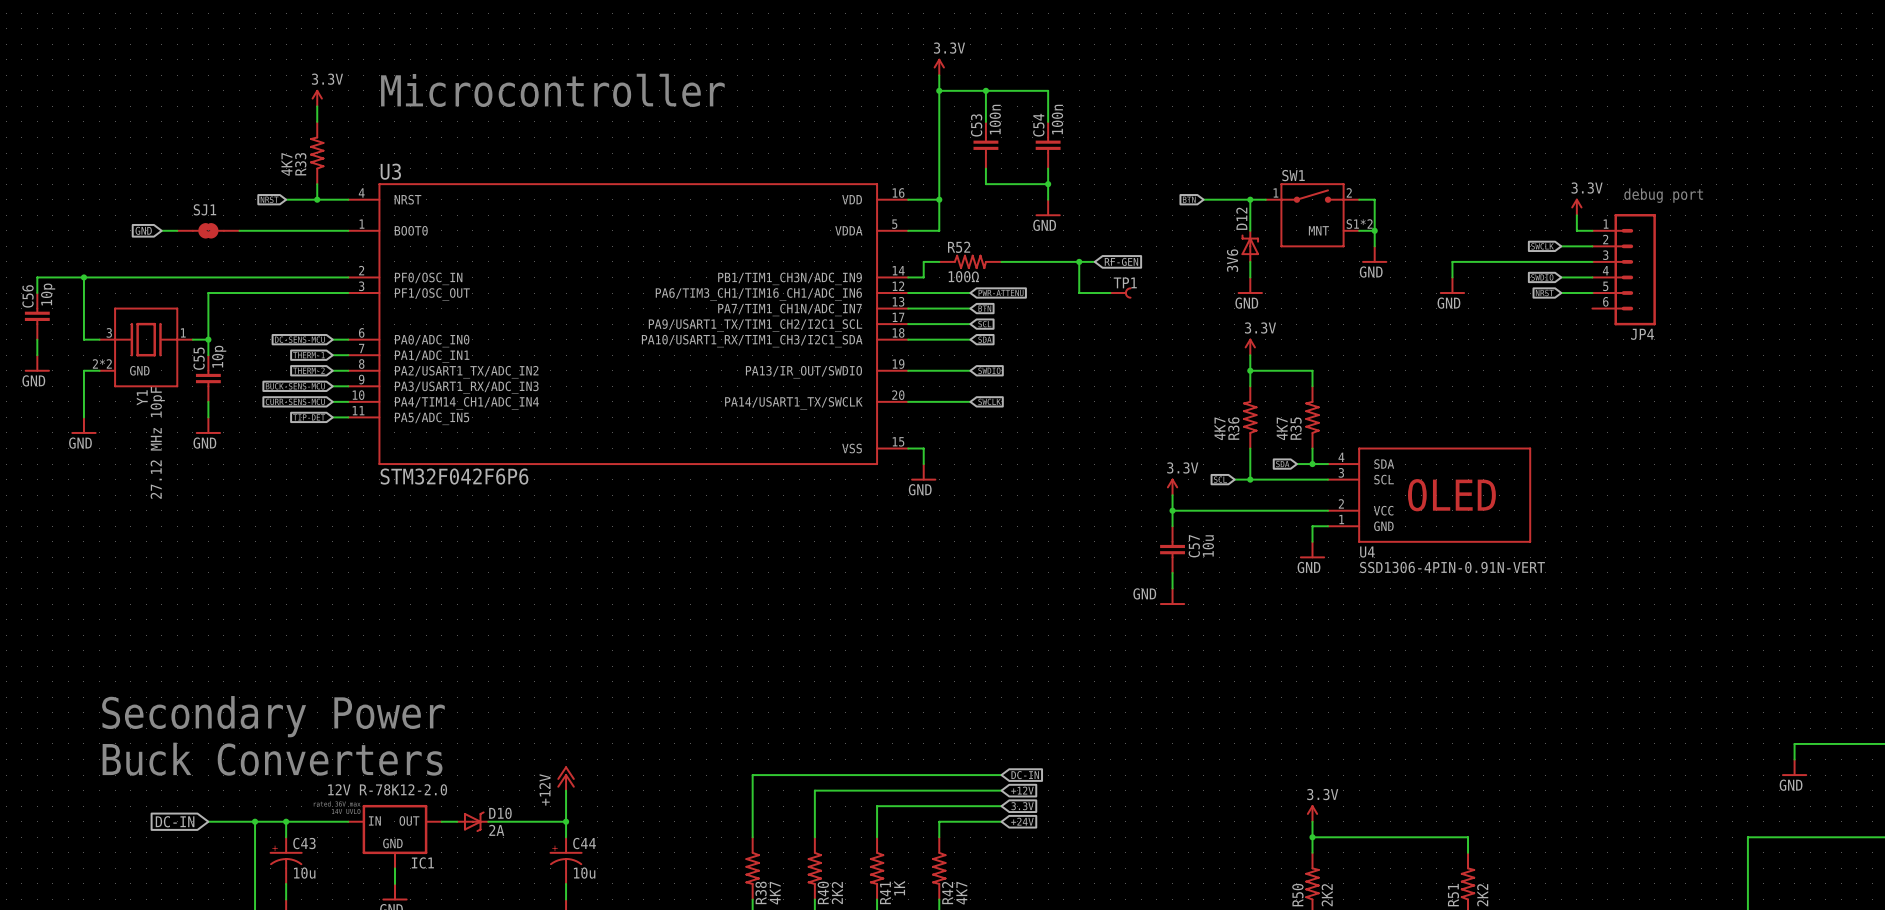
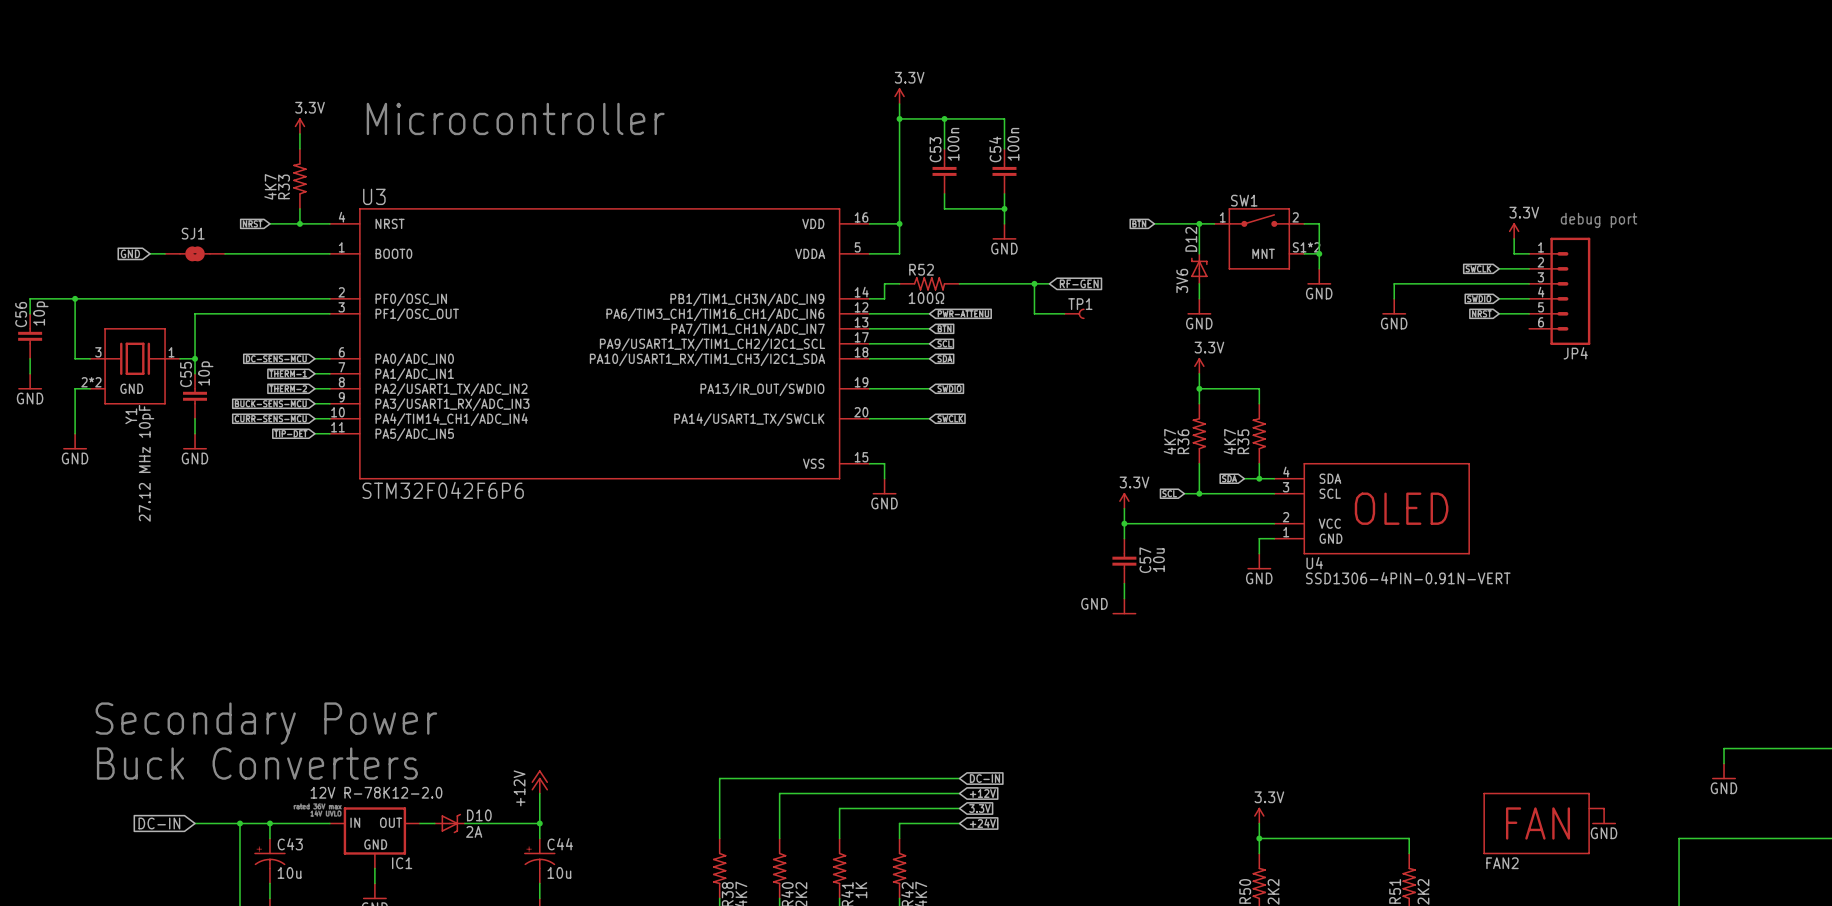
power symbol: none -> GND (1604, 816)
FAN2: none -> (1543, 823)

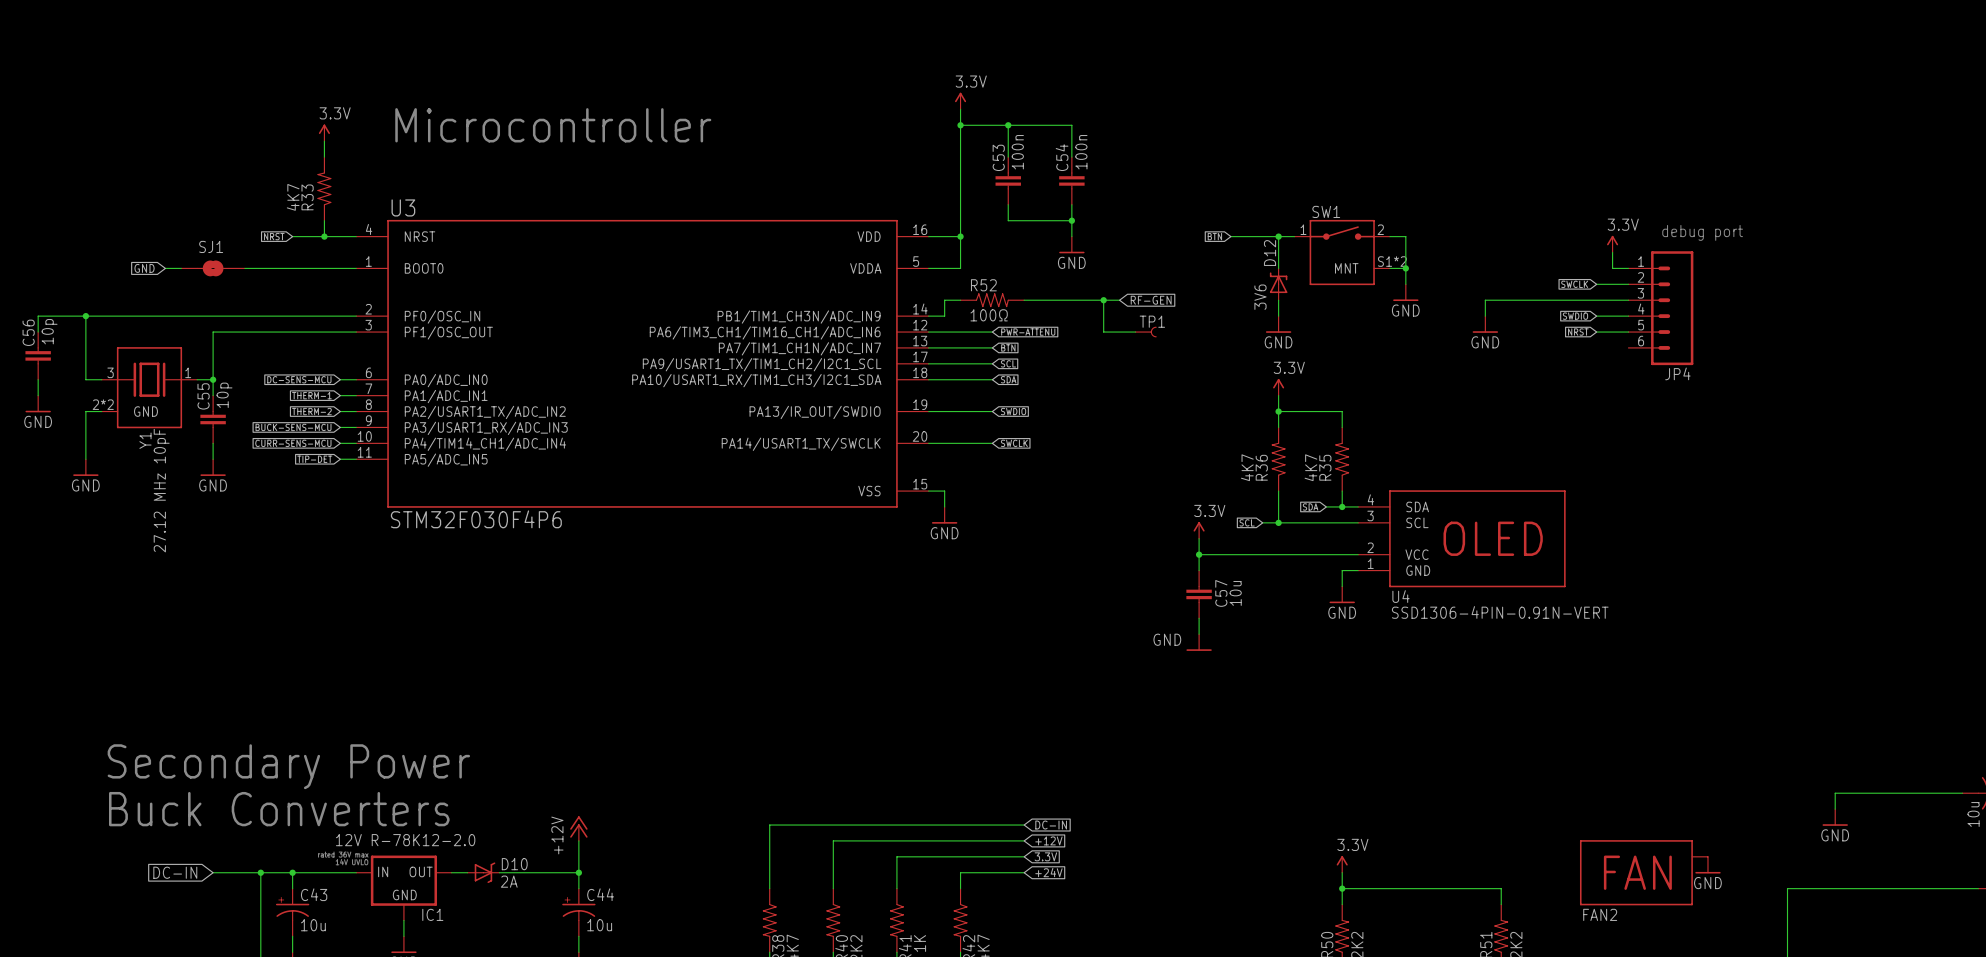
U3 value: STM32F042F6P6 (443, 490) -> STM32F030F4P6 (476, 519)

